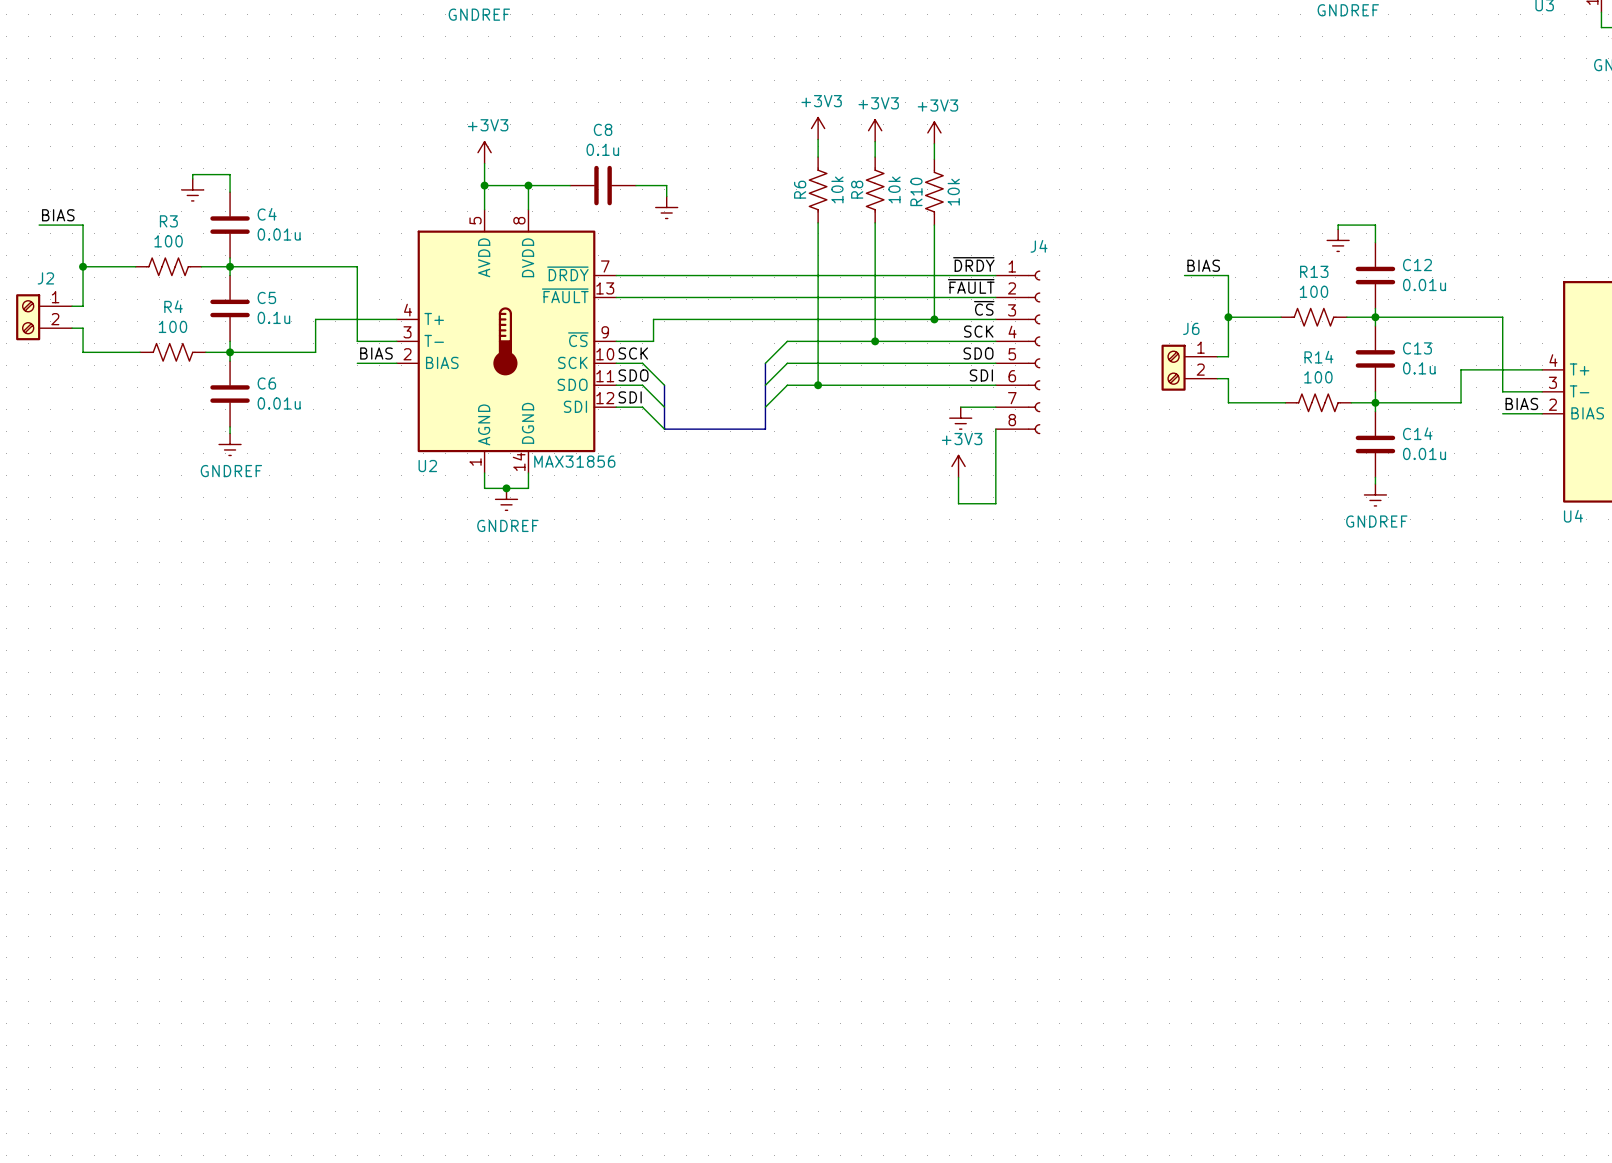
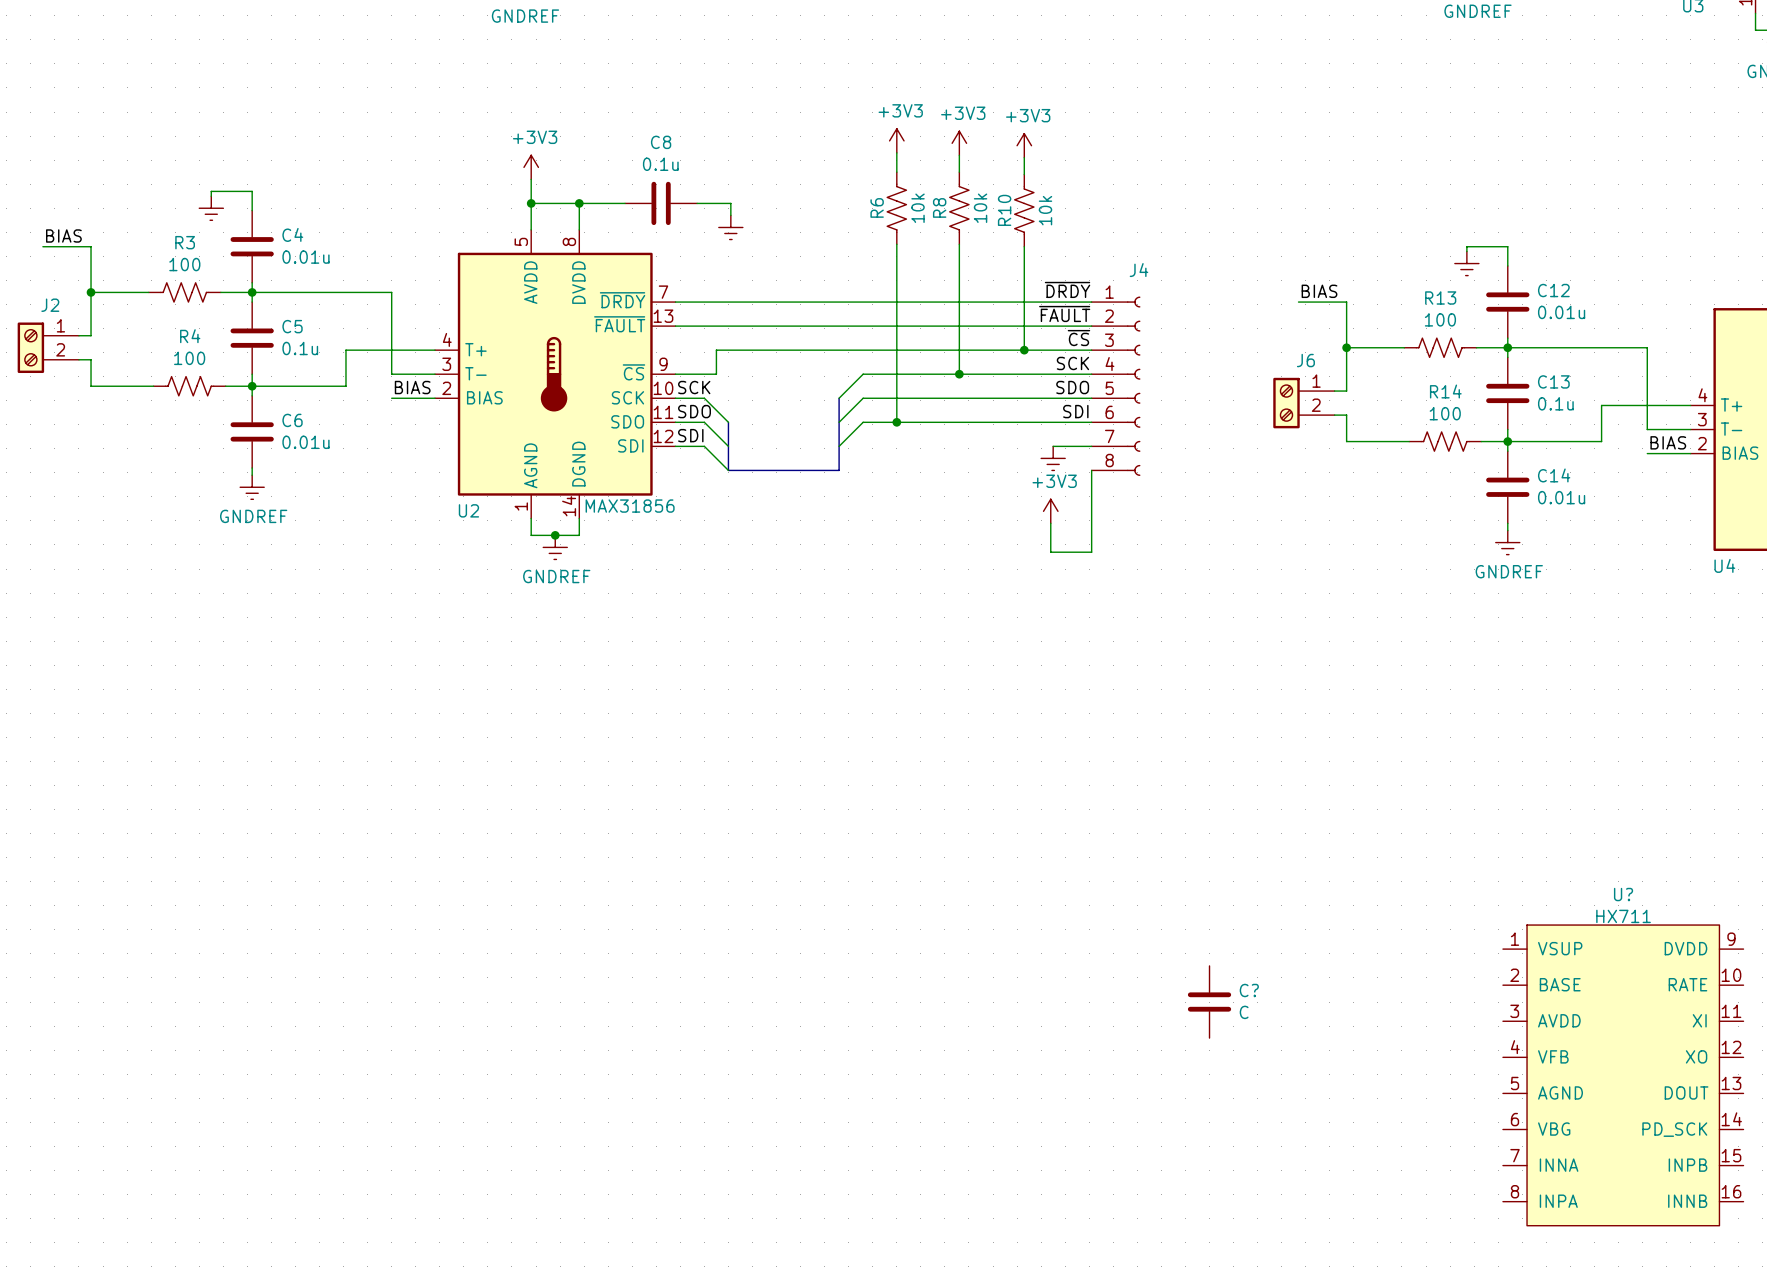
C?: none -> C (1209, 1002)
U?: none -> HX711 (1623, 1075)

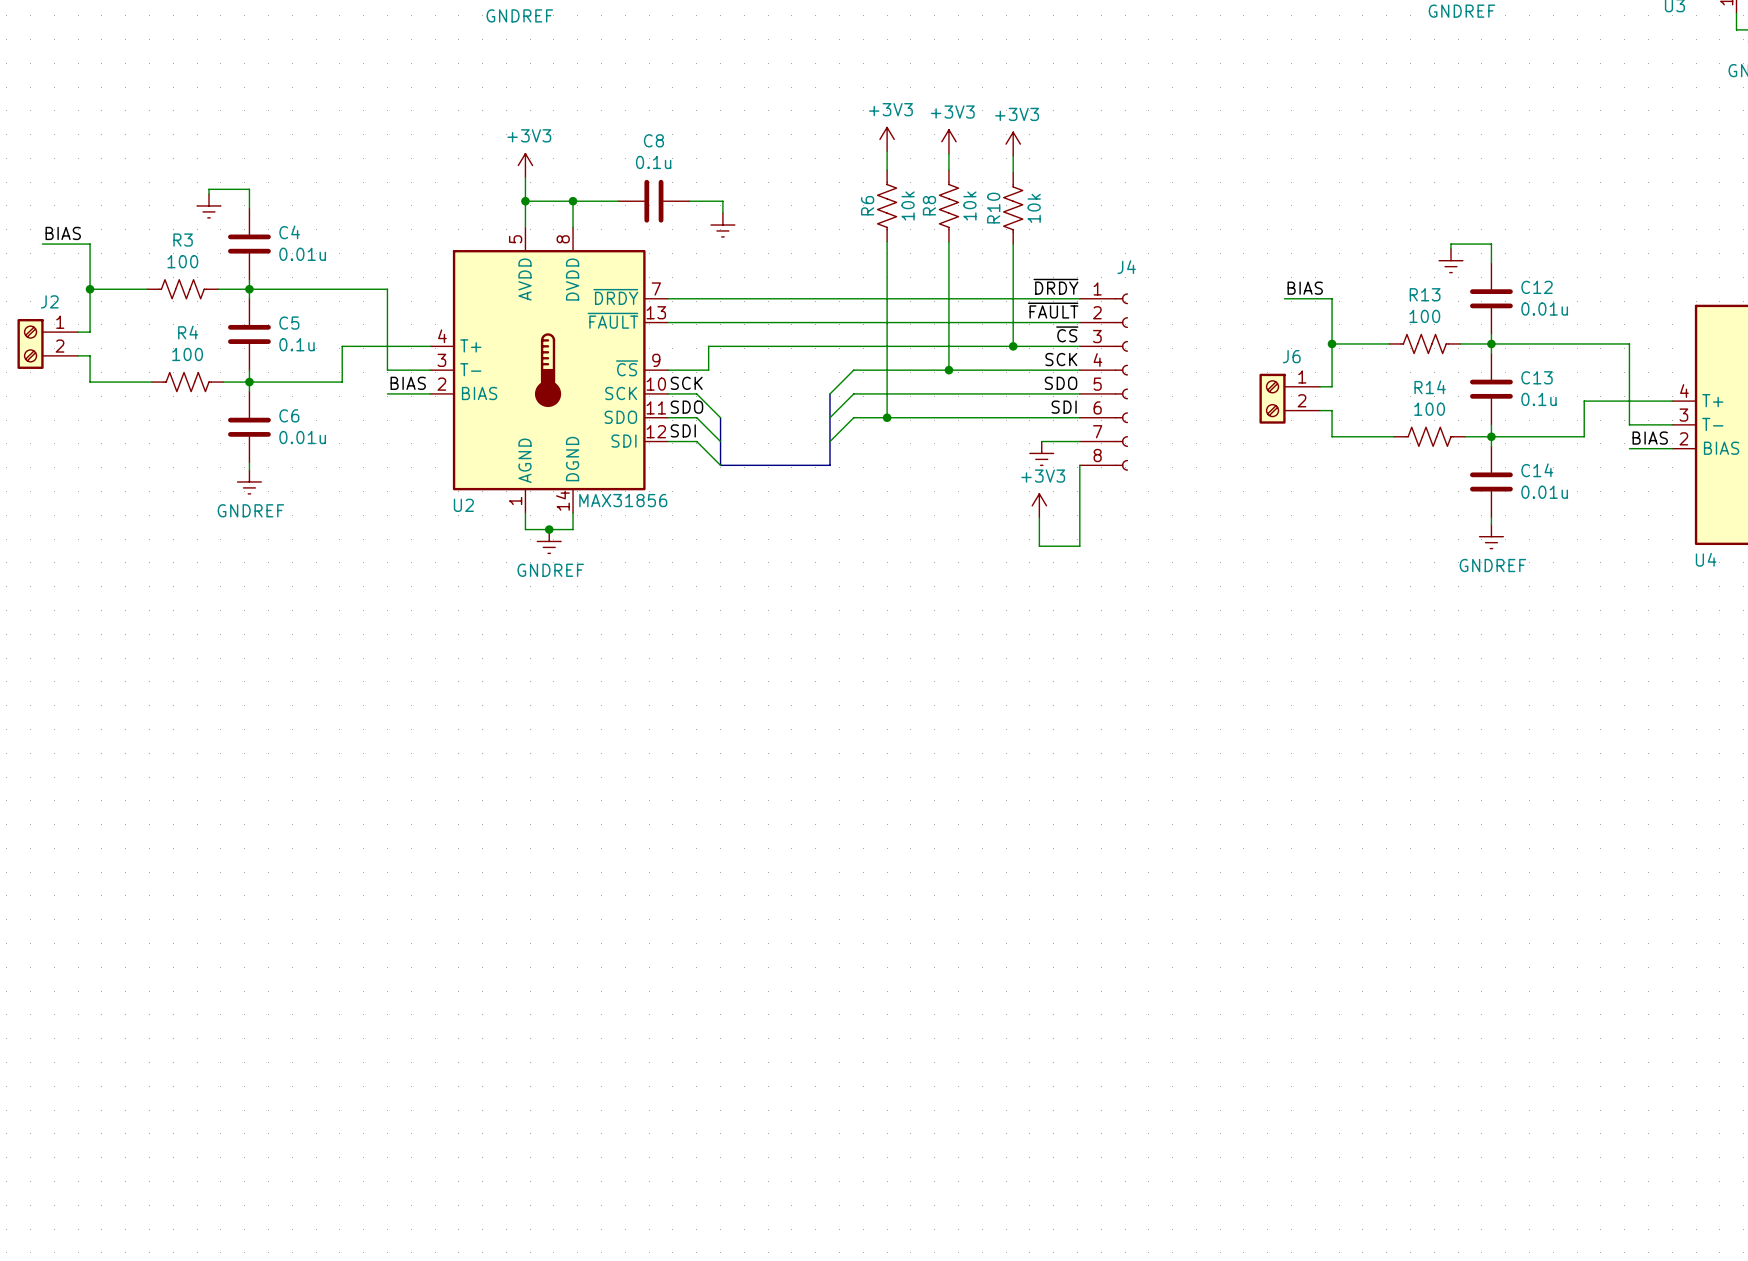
C?: C (1209, 1002) -> none
U?: HX711 (1623, 1075) -> none

